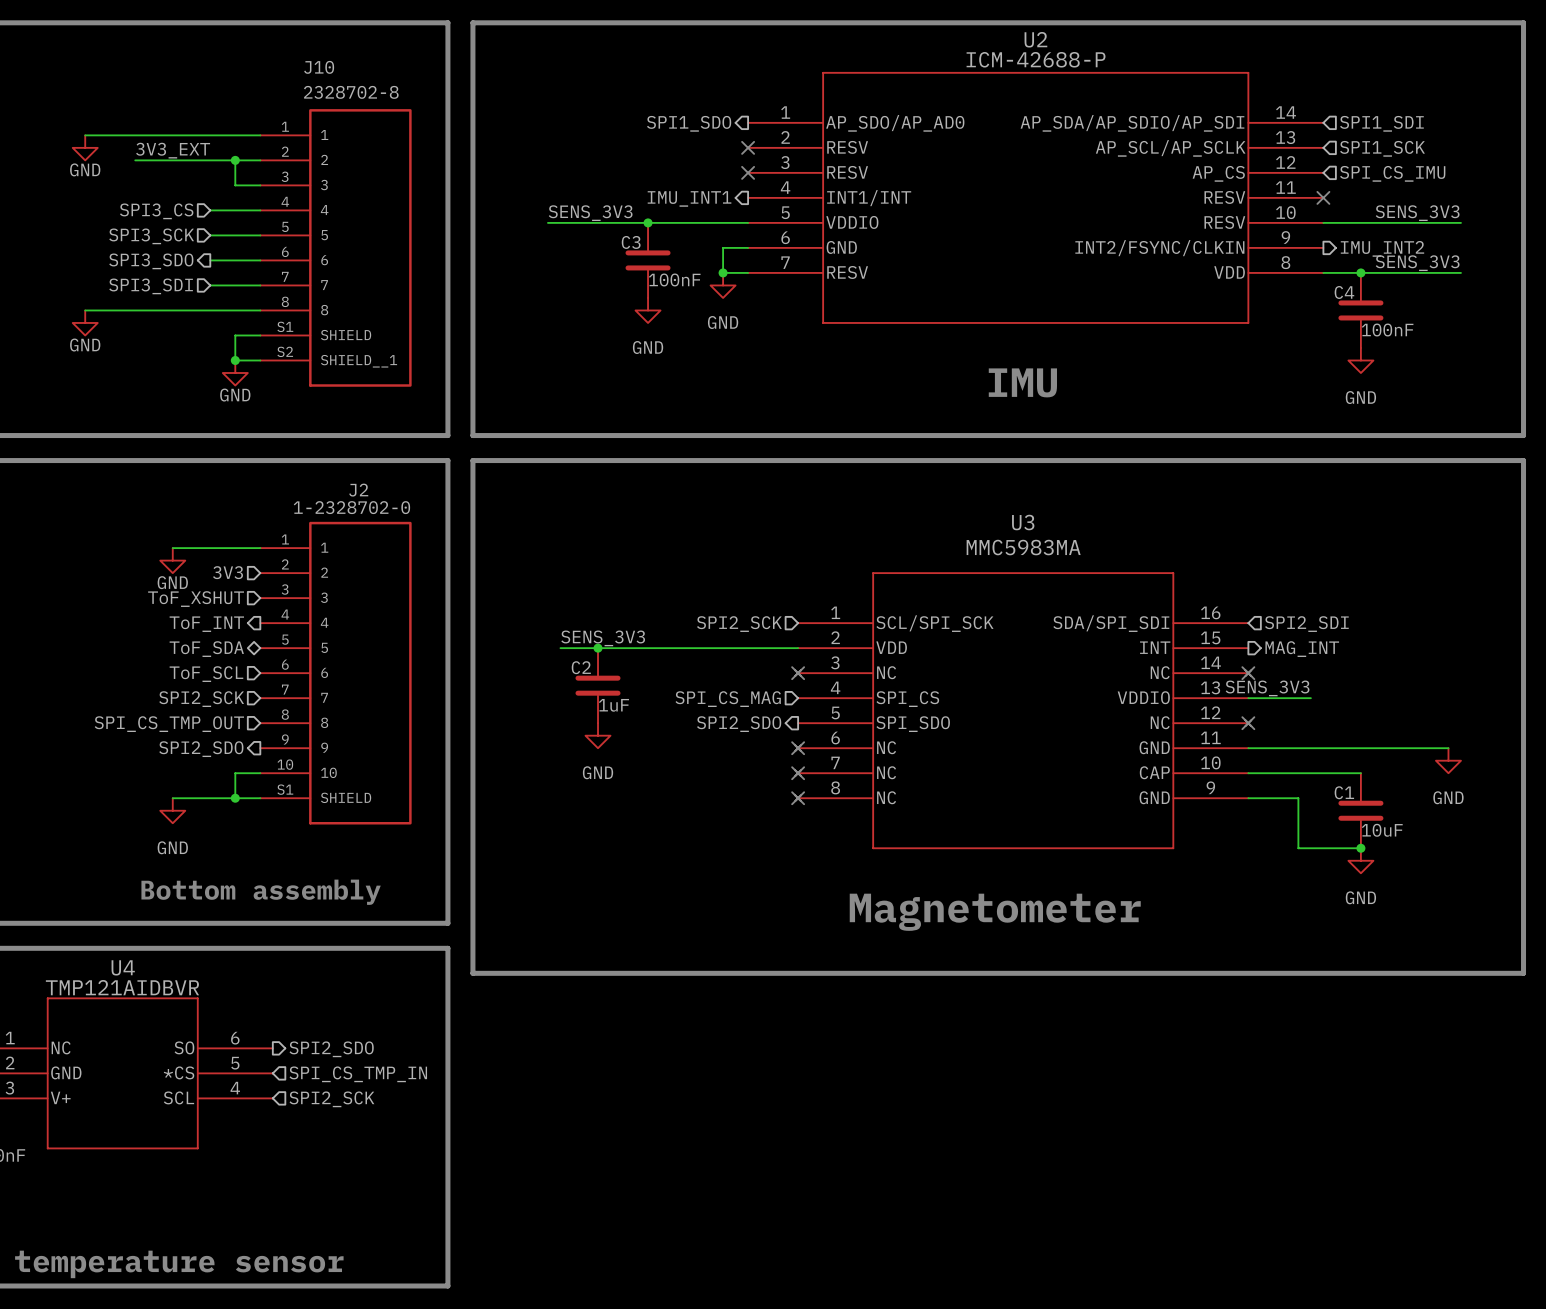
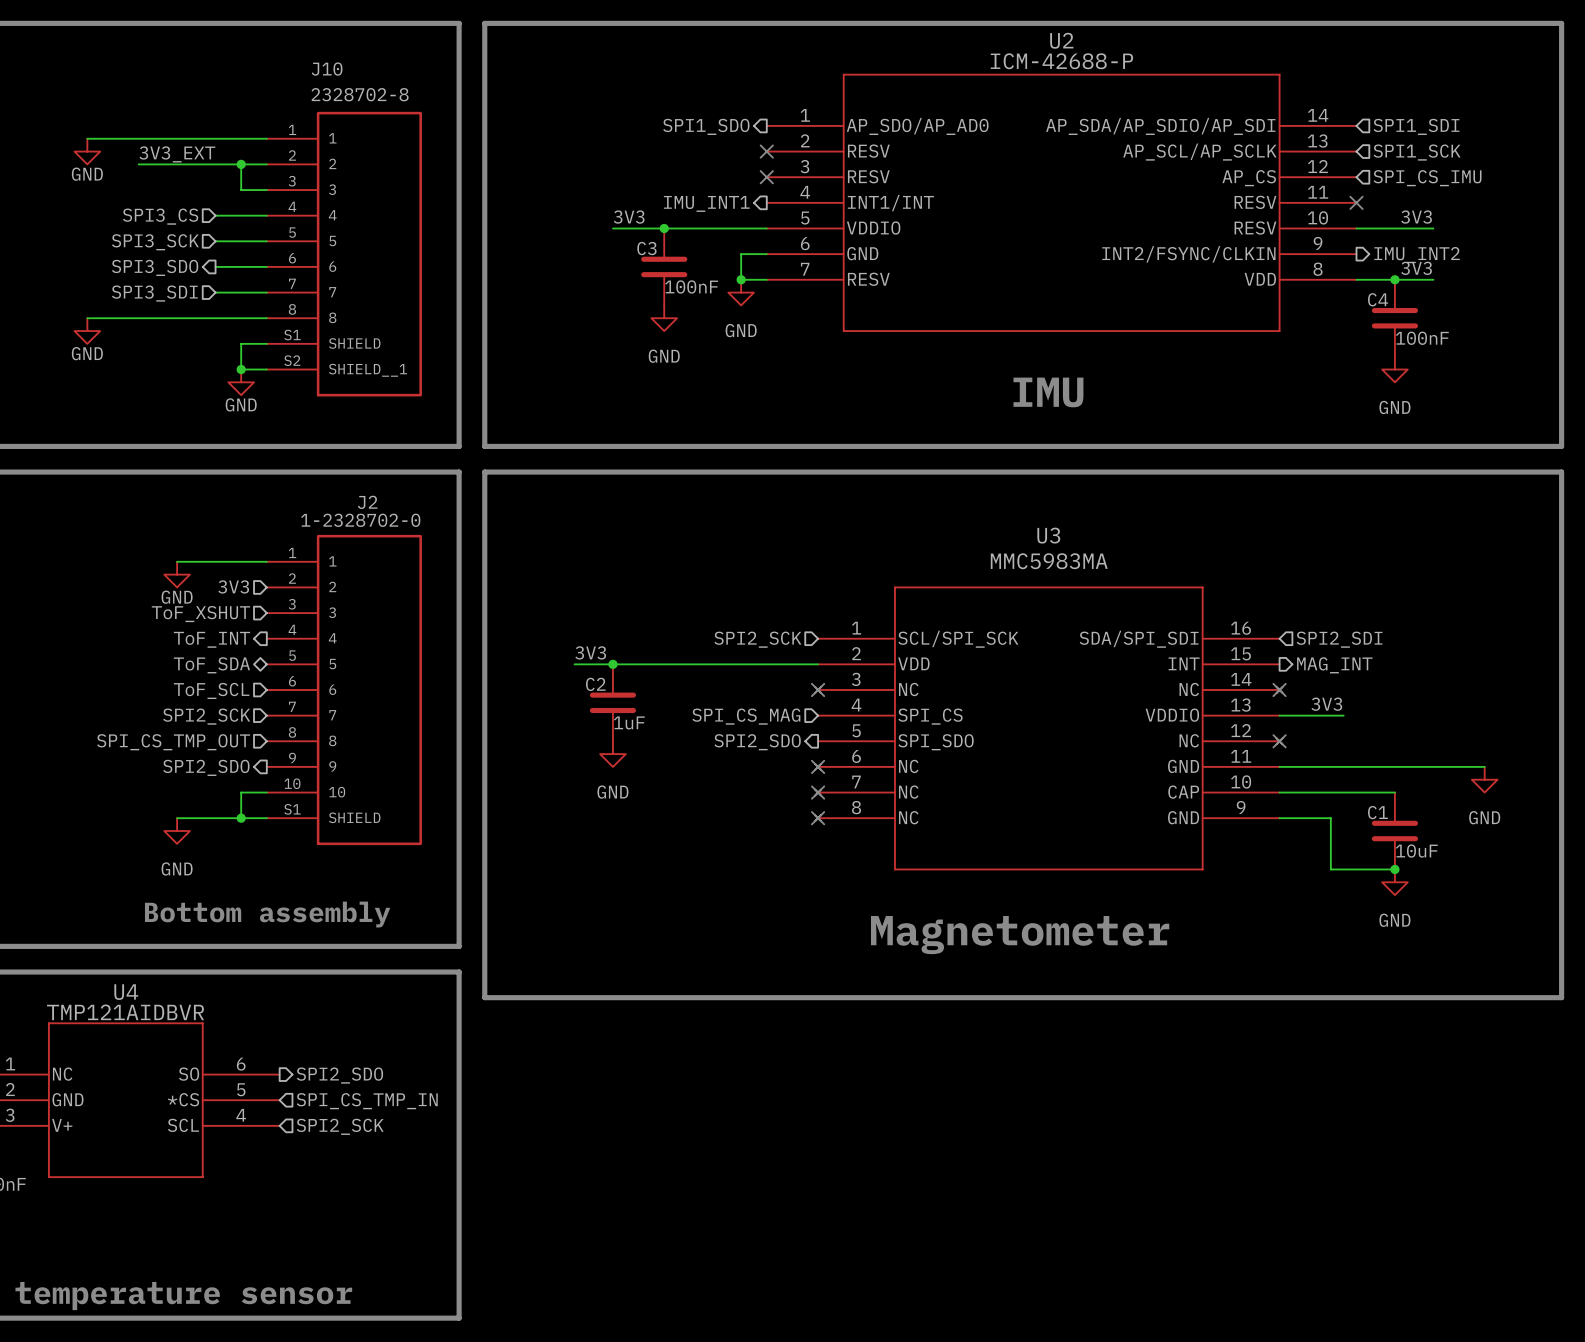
label: none -> 3V3 (629, 217)
label: none -> 3V3 (1416, 217)
label: SENS_3V3 (590, 213) -> none
label: SENS_3V3 (1417, 213) -> none
wire: (547, 222) (598, 222) -> none
wire: (1398, 222) (1460, 222) -> none
label: none -> 3V3 (1416, 268)
label: SENS_3V3 (1417, 263) -> none
wire: (1398, 272) (1460, 272) -> none
label: SENS_3V3 (603, 638) -> 3V3 (590, 652)
label: SENS_3V3 (1267, 688) -> 3V3 (1326, 704)

